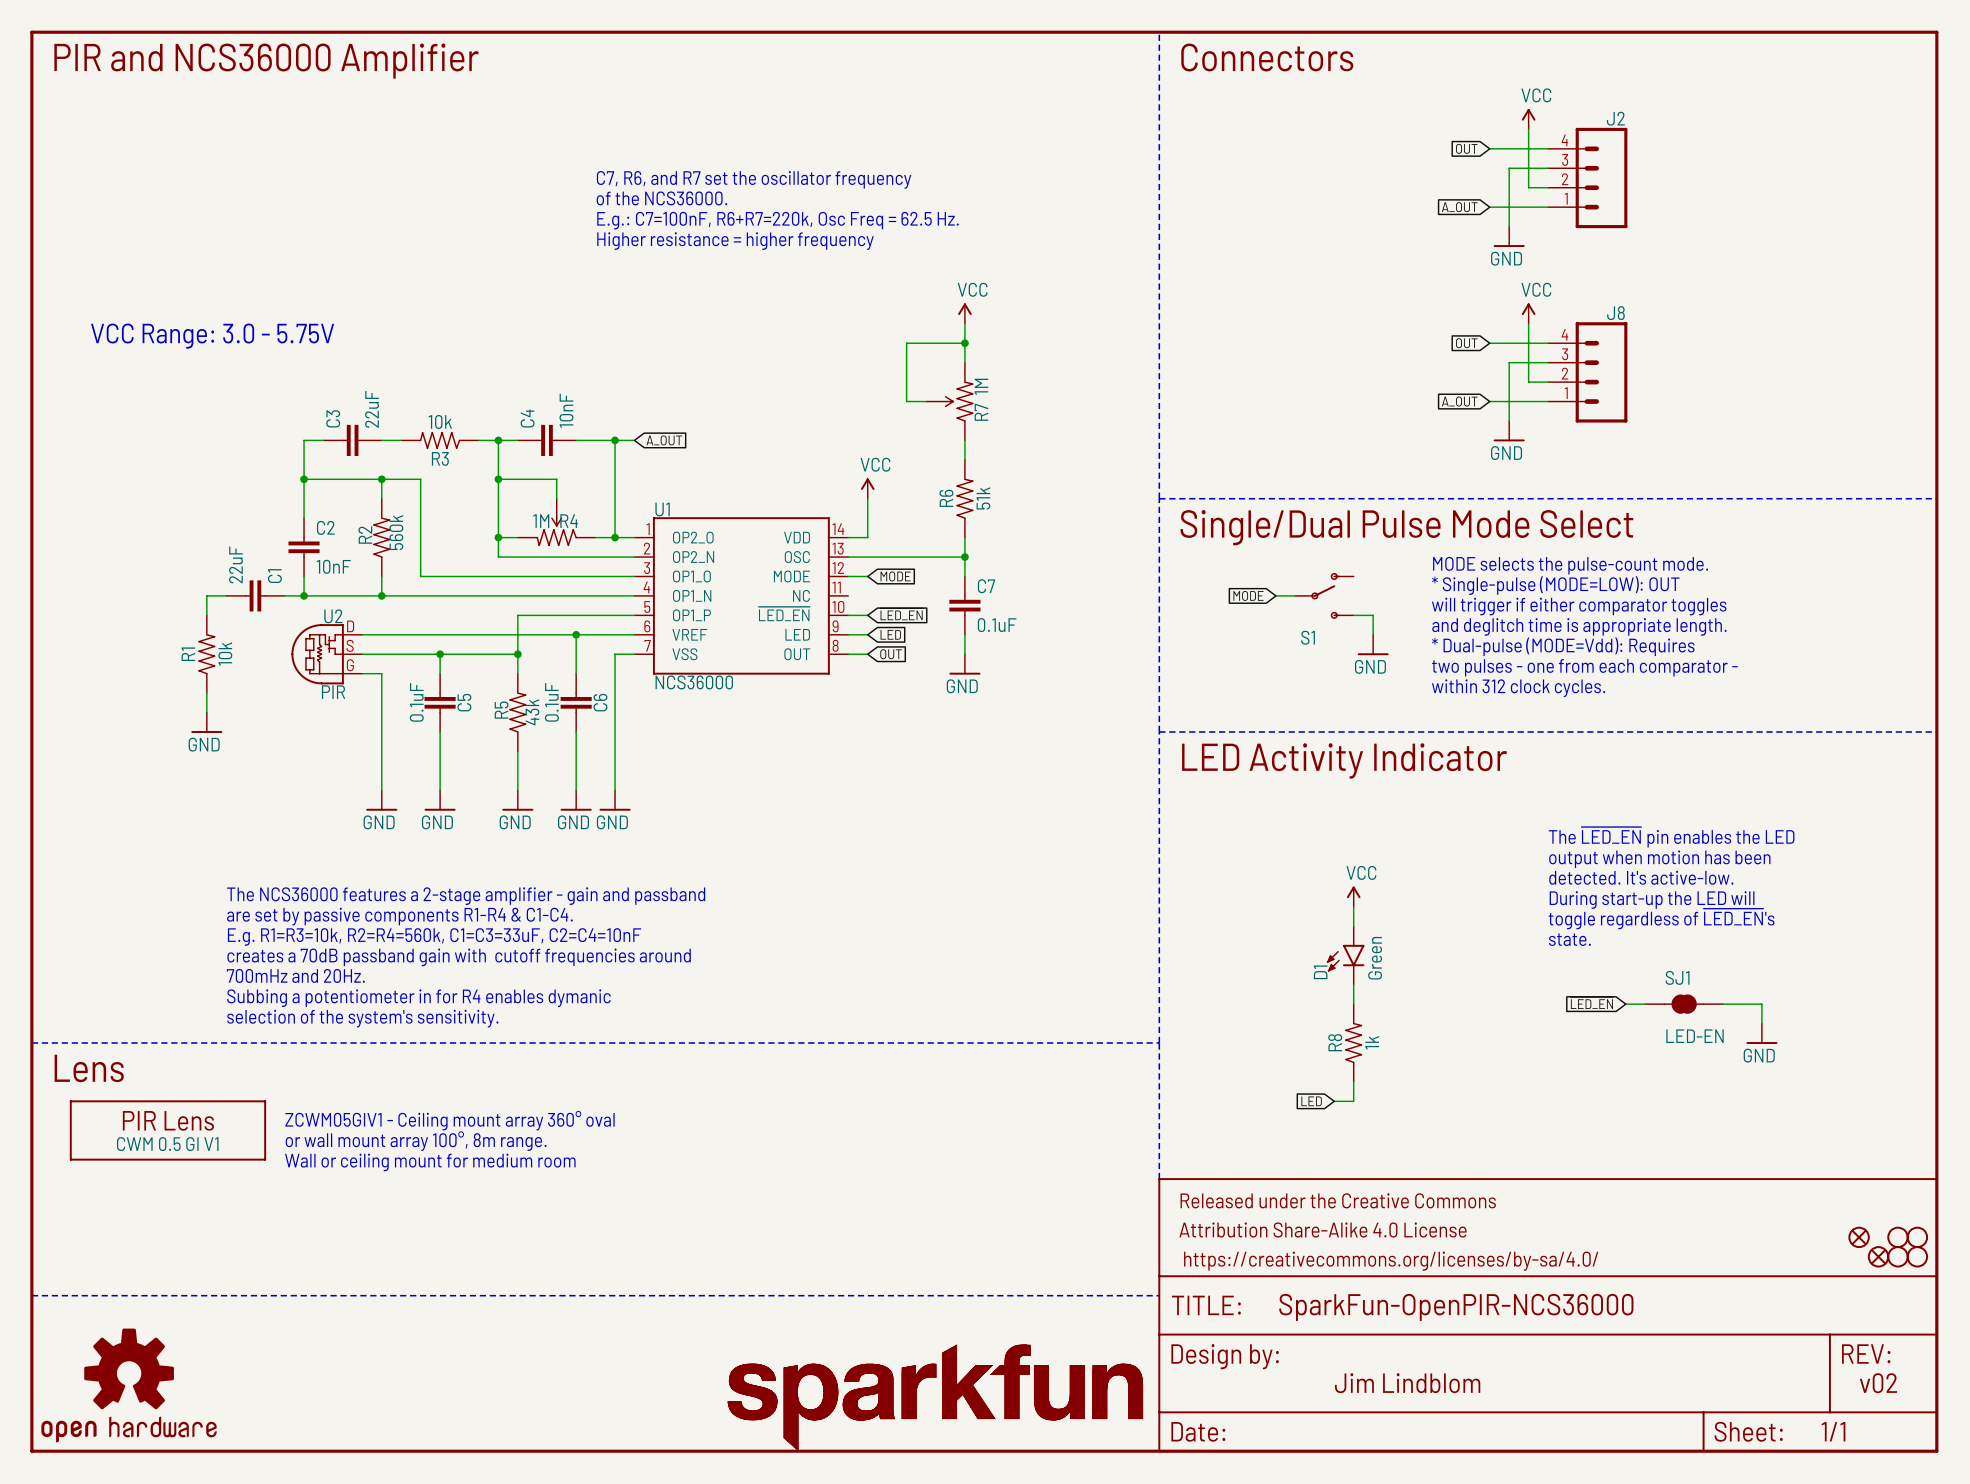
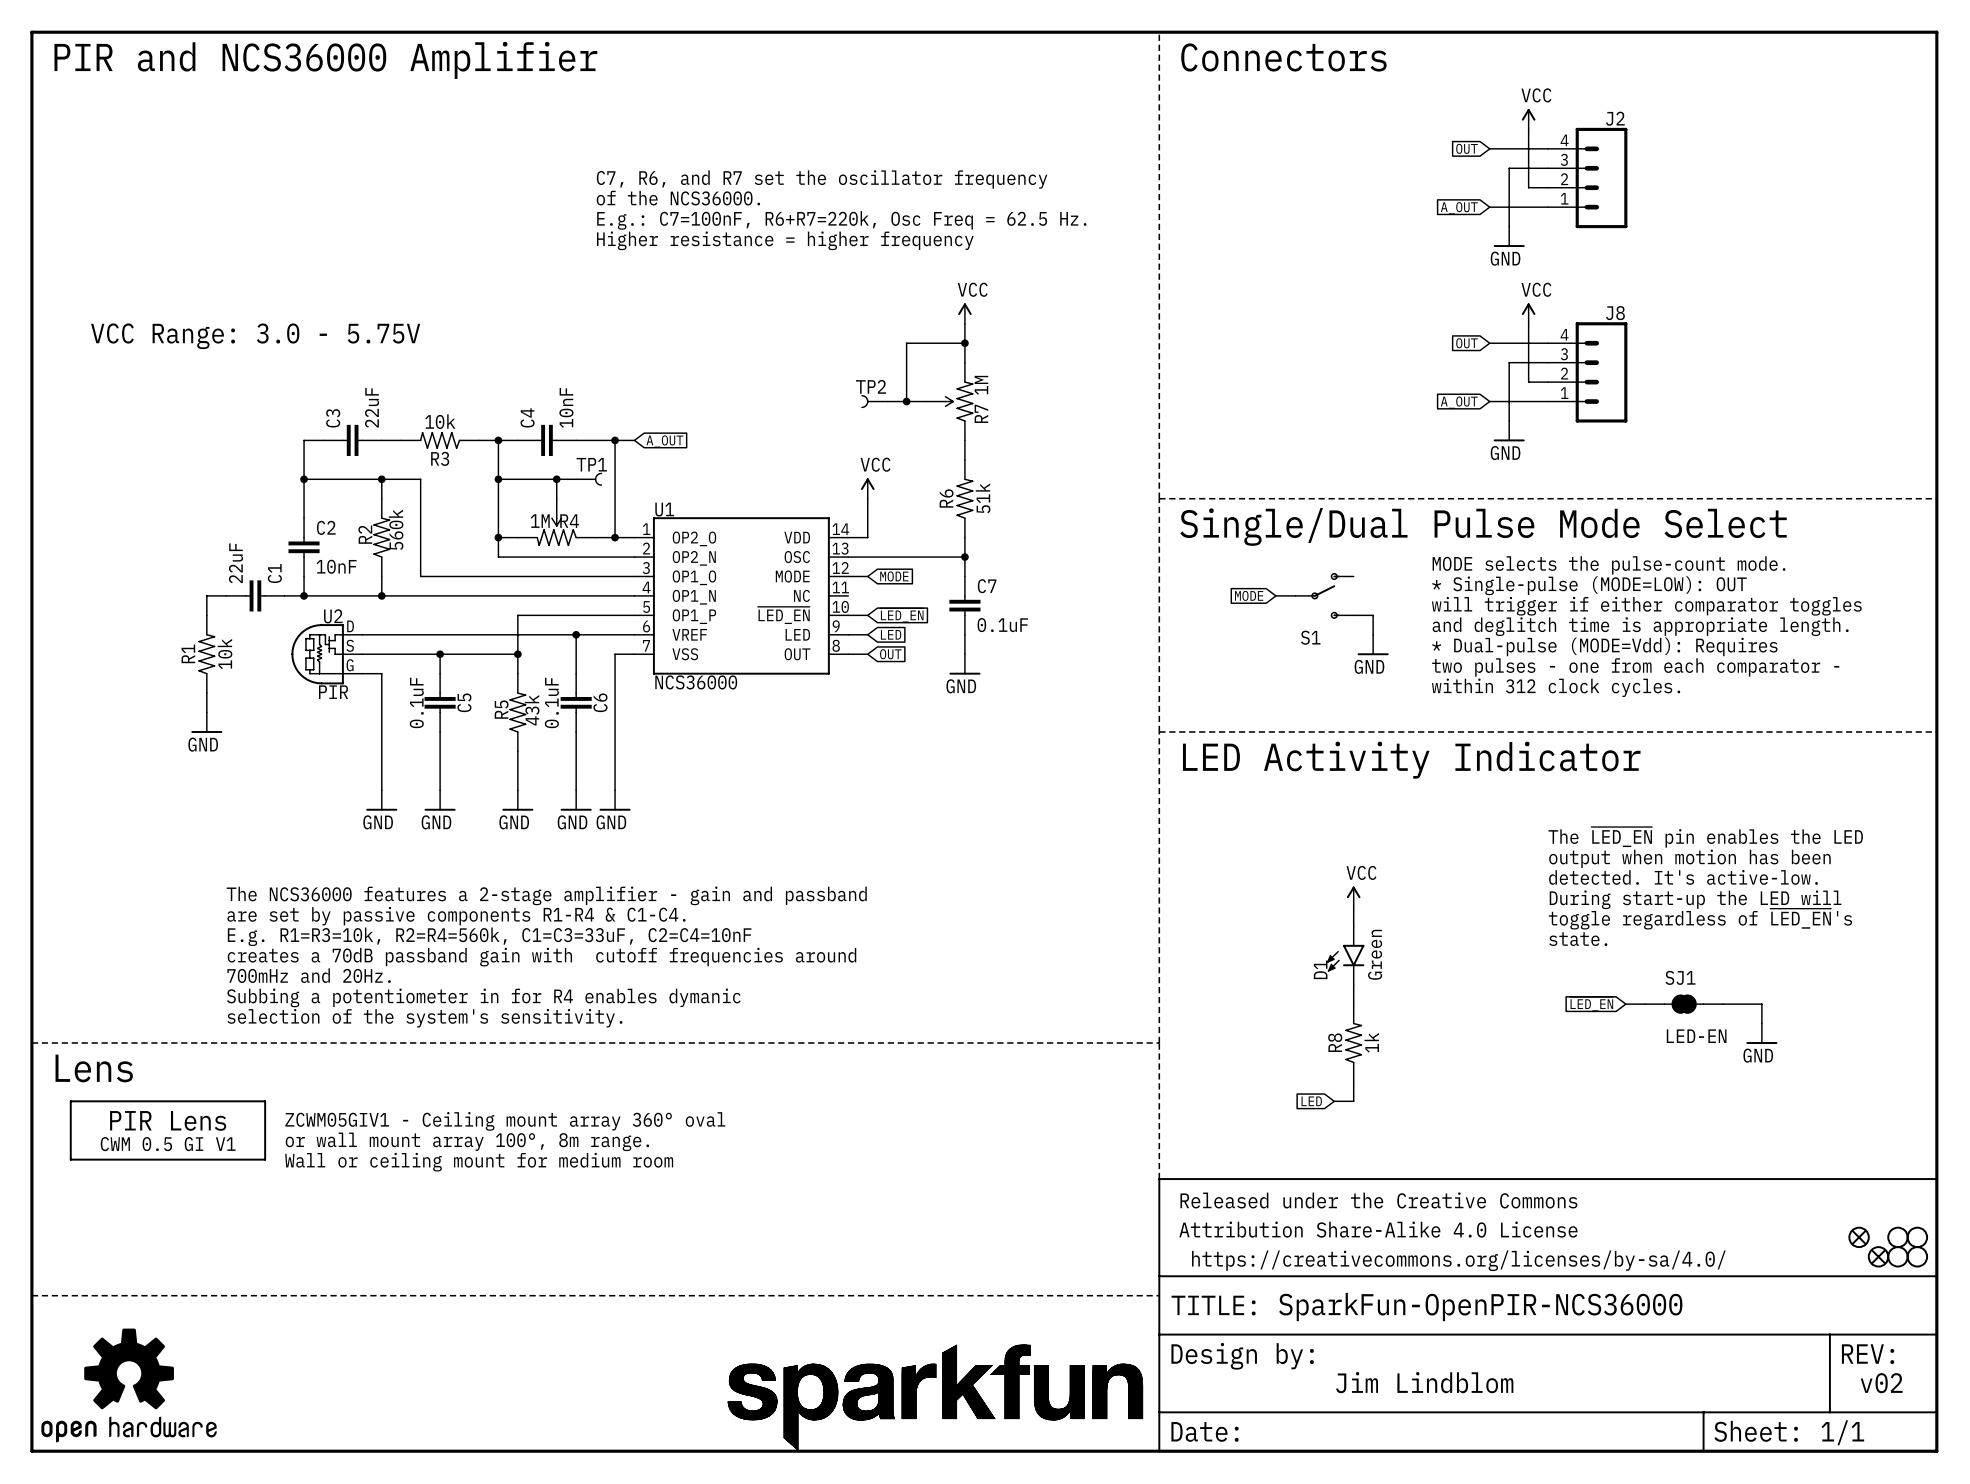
TP2: none -> (874, 401)
wire: none -> (887, 401) (906, 401)
junction: none -> (906, 401)
wire: none -> (556, 479) (576, 479)
junction: none -> (556, 479)
TP1: none -> (588, 479)

